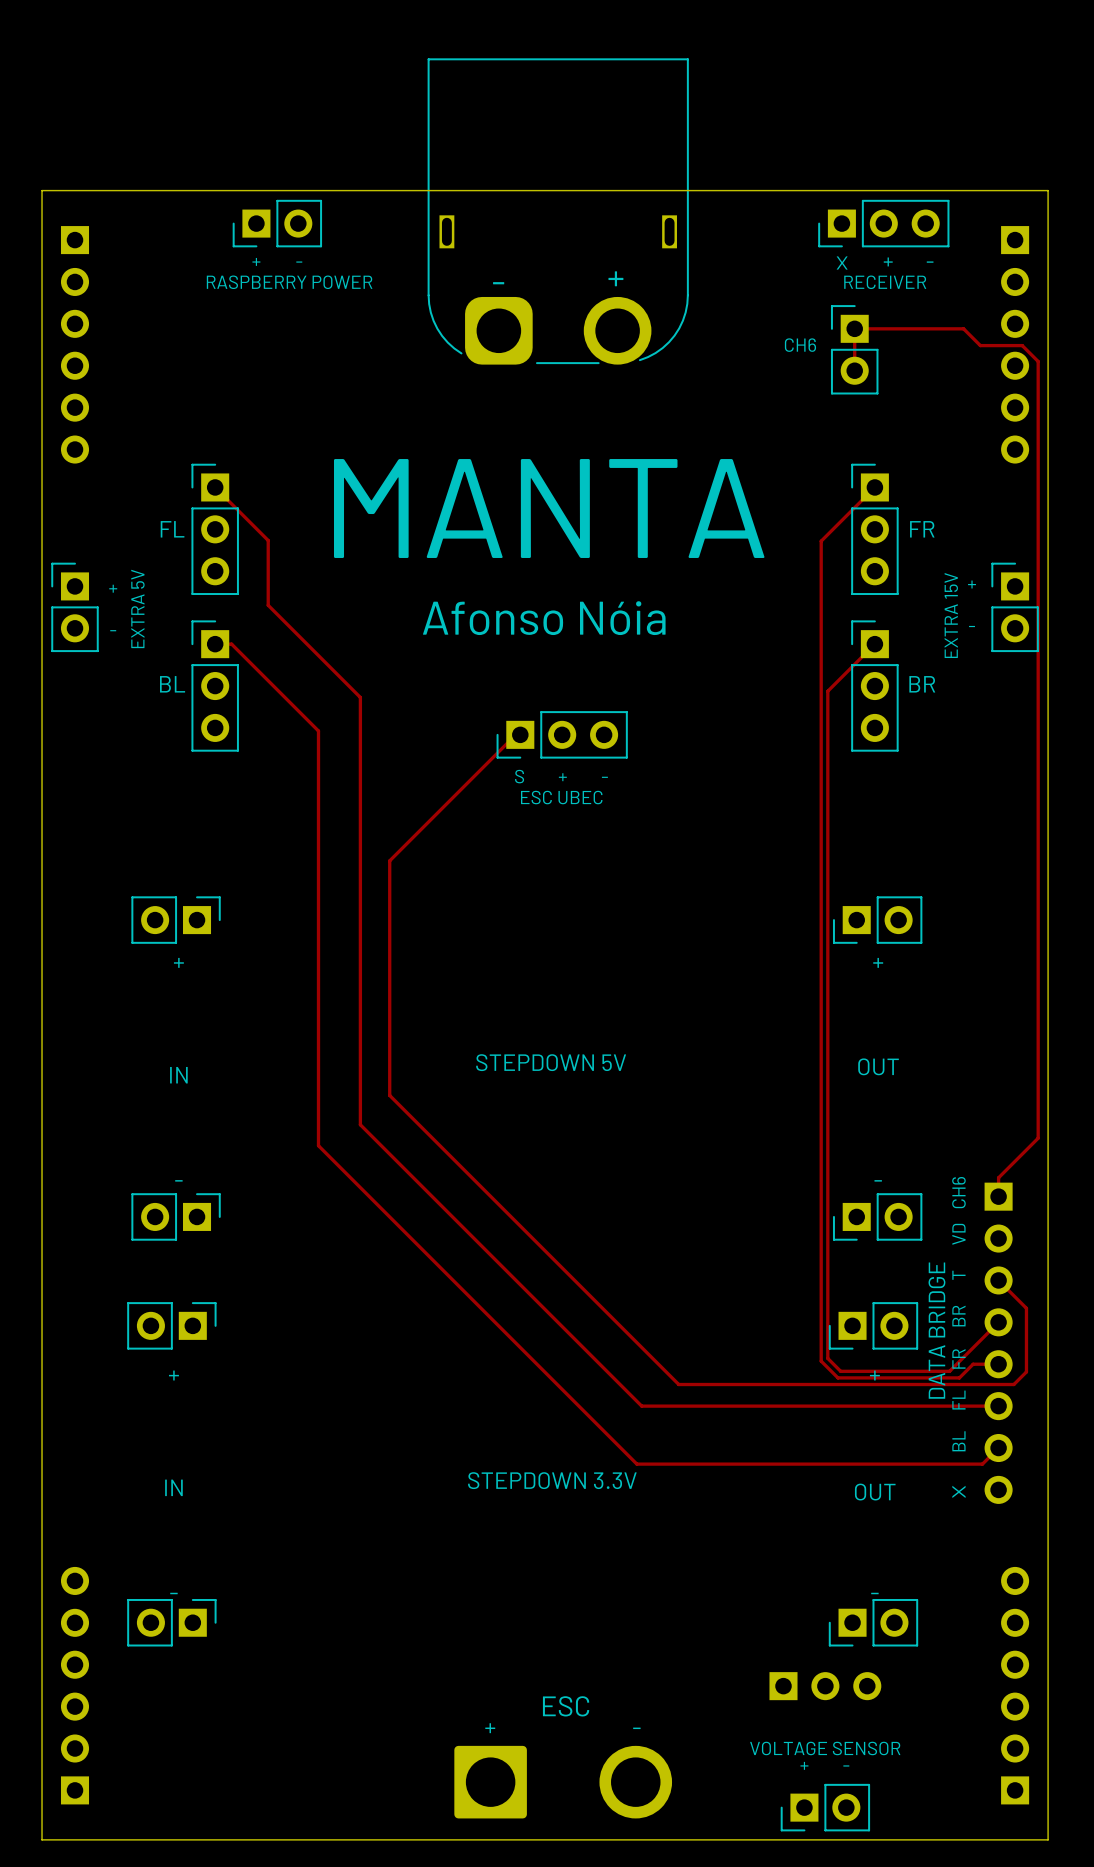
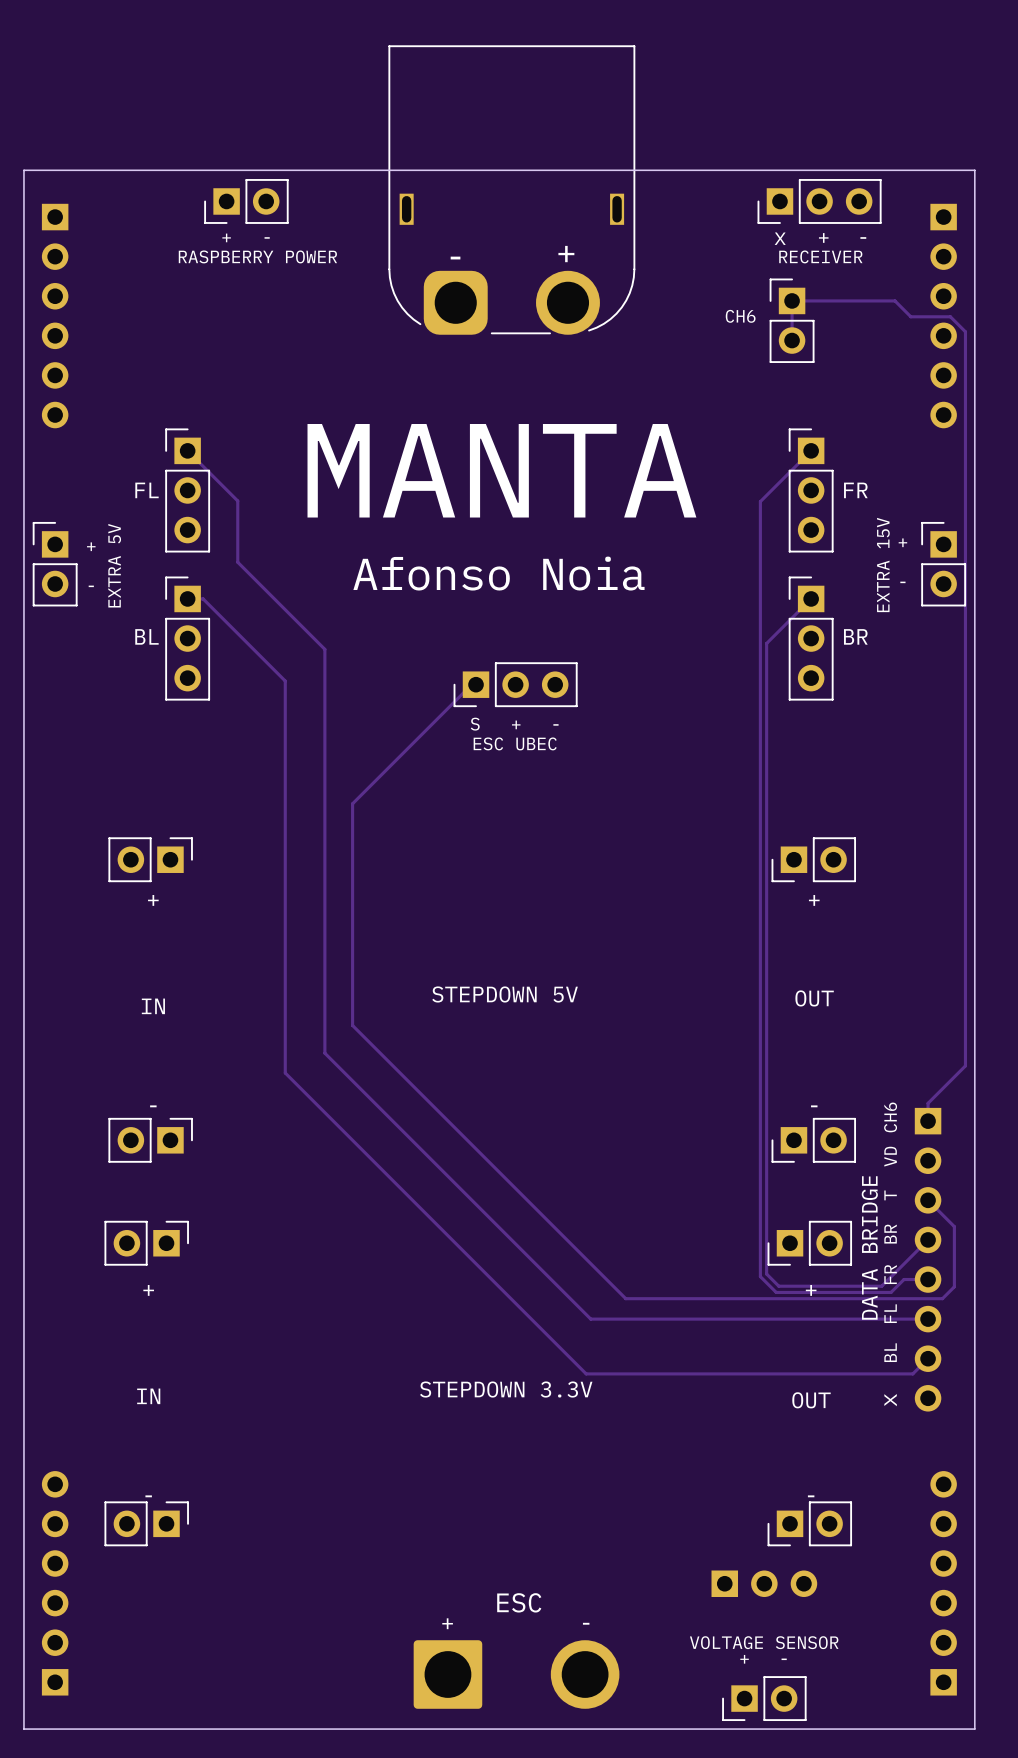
text: Afonso Nóia (544, 618) -> Afonso Noia (498, 573)

